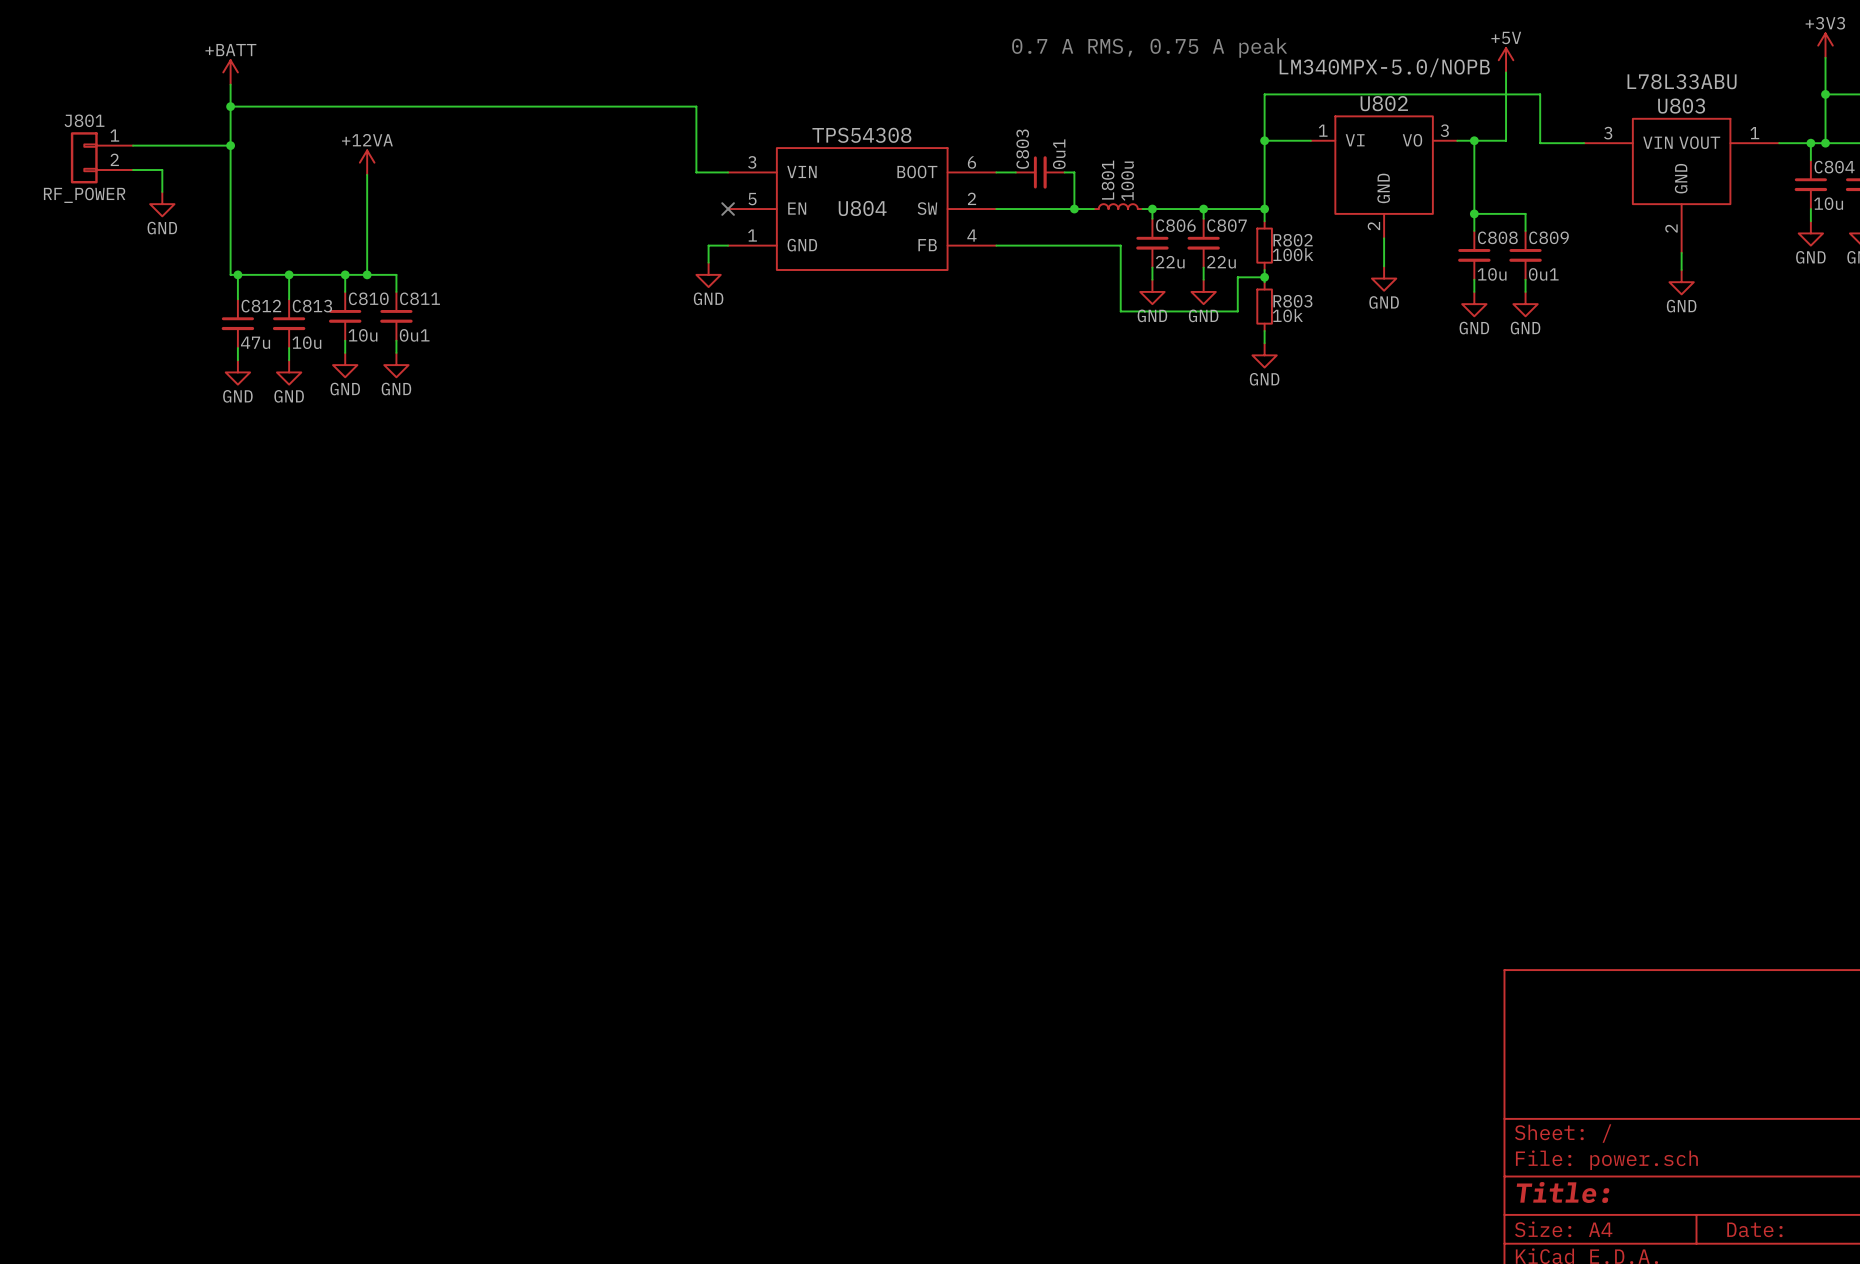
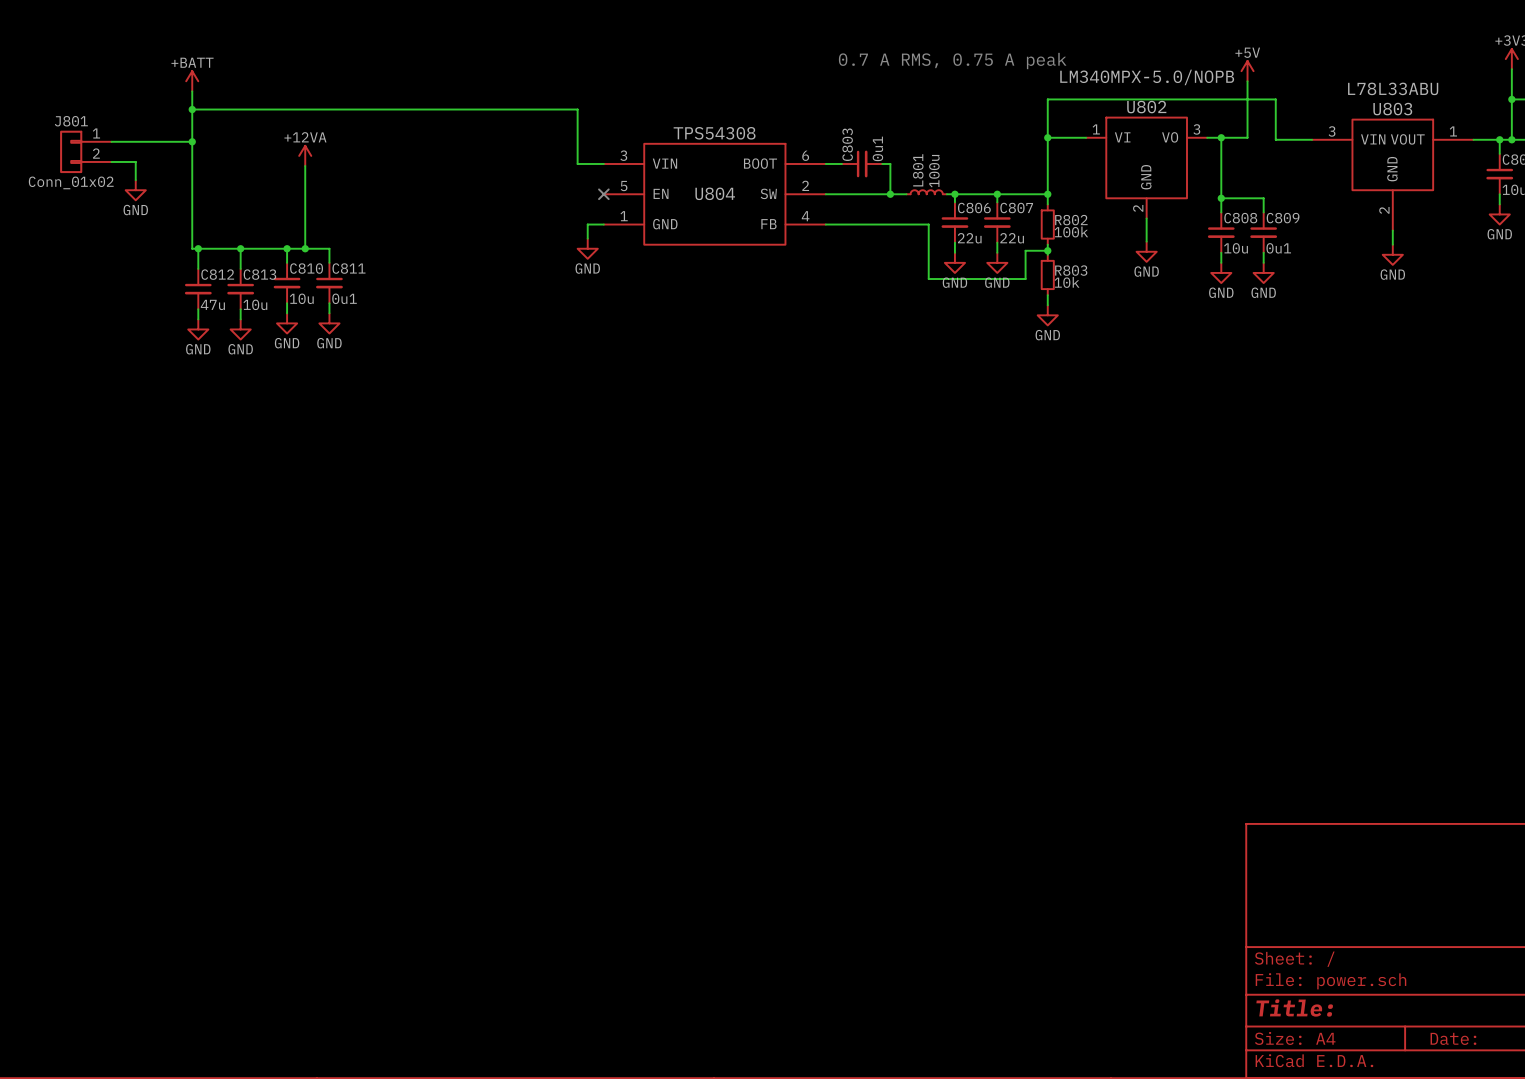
J801 value: RF_POWER (84, 195) -> Conn_01x02 (71, 182)

